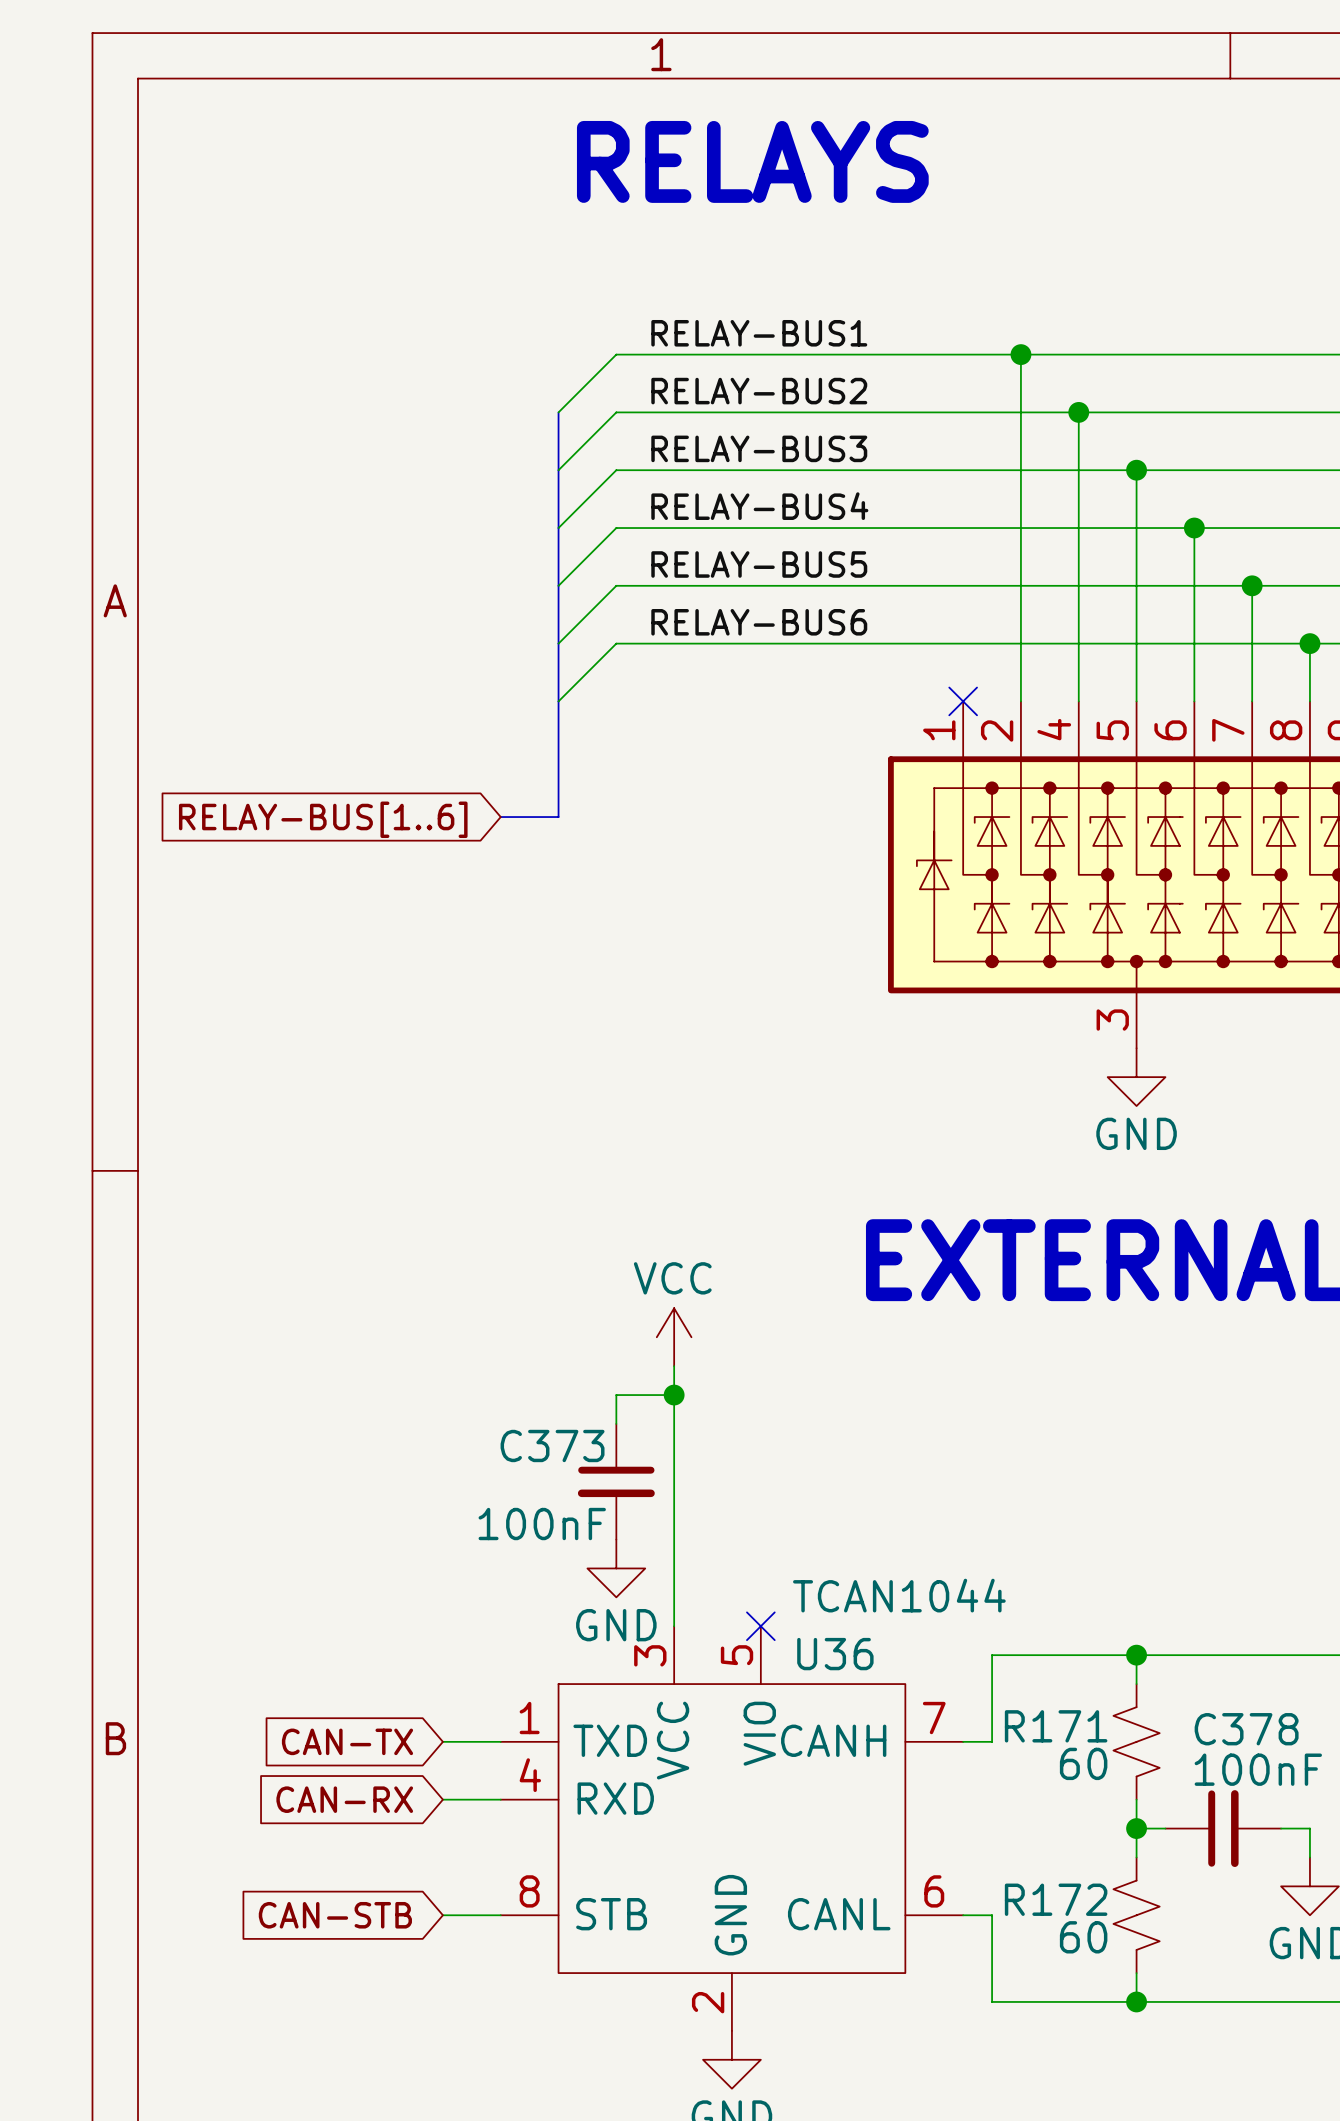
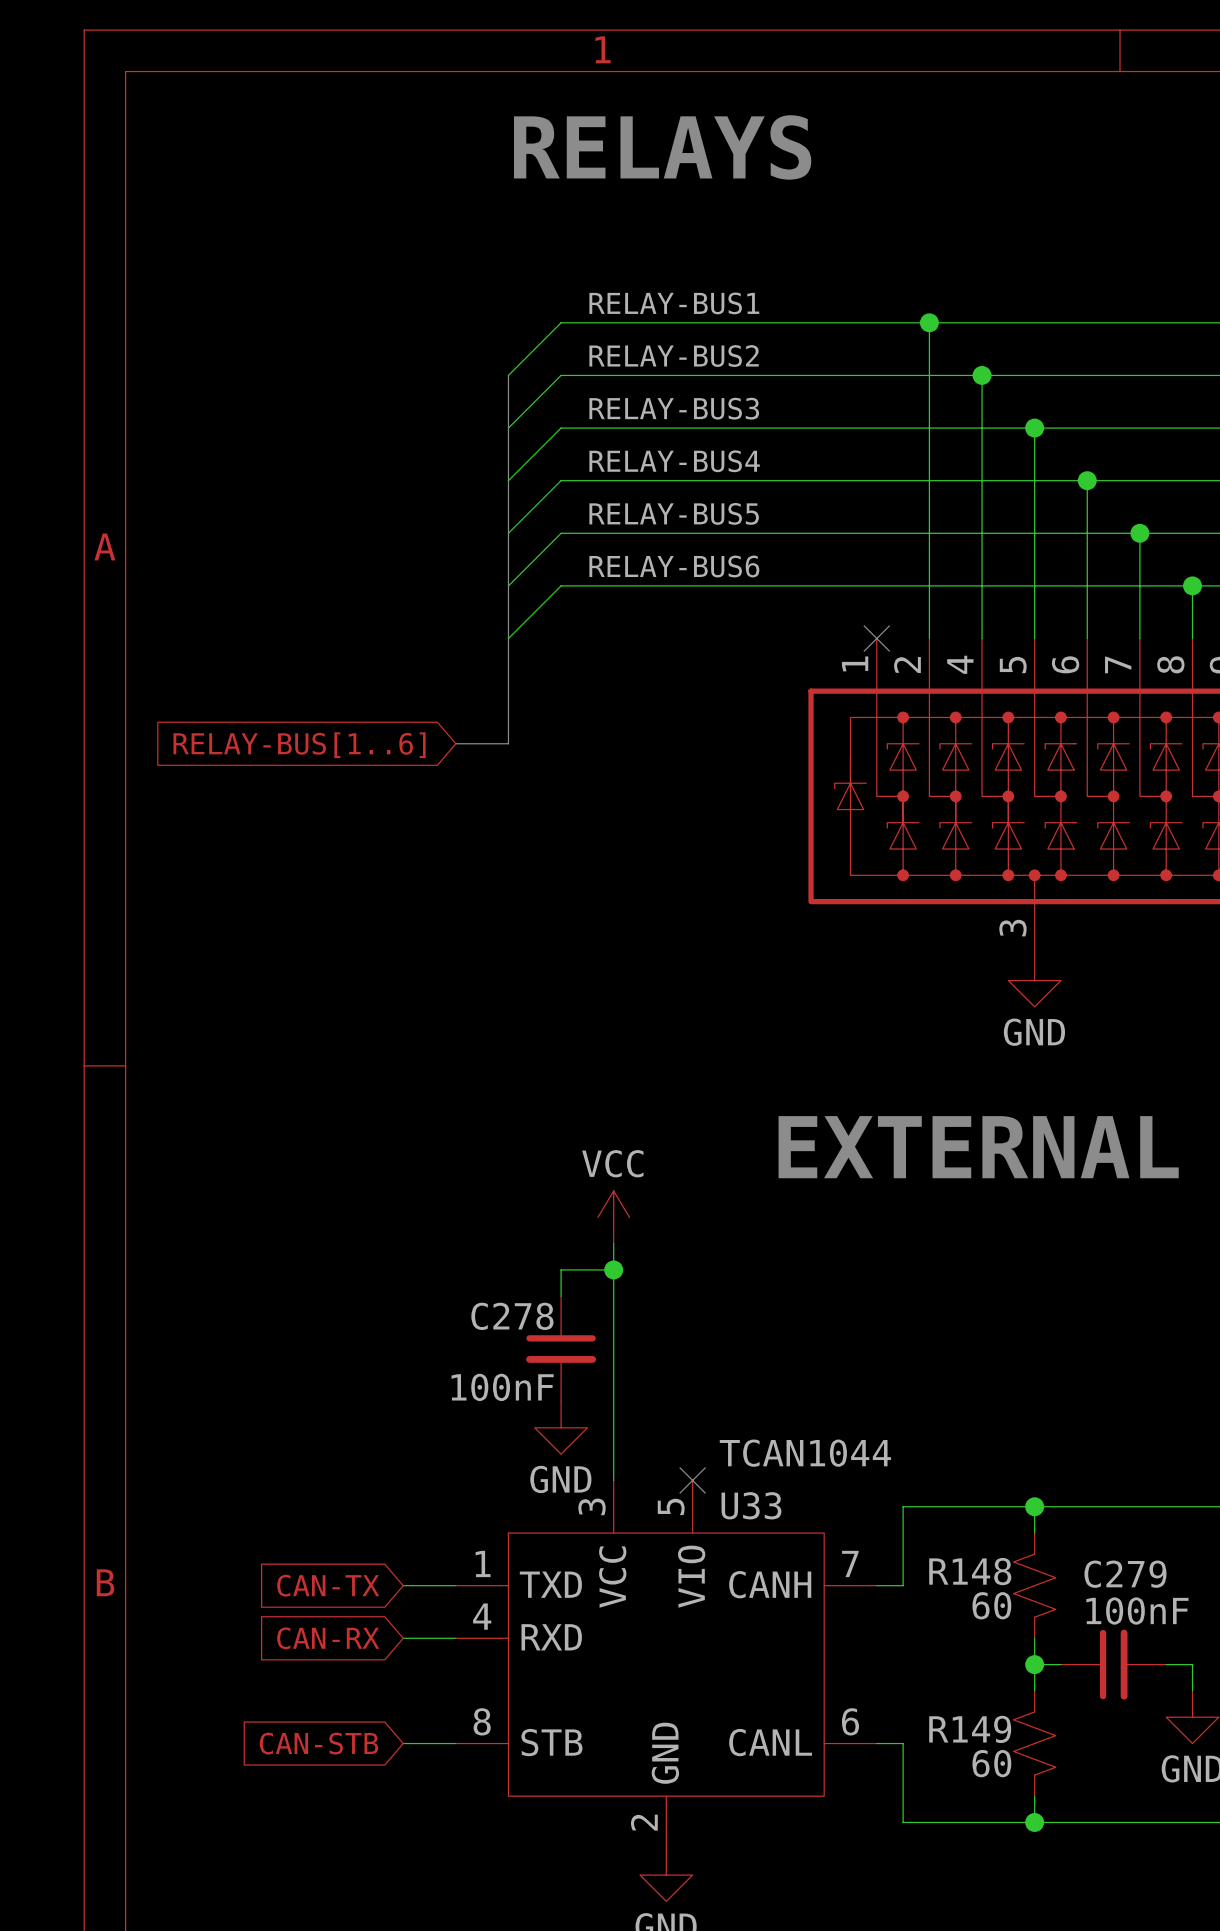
C373 name: C373 (552, 1445) -> C278 (512, 1316)
U36 name: U36 (835, 1654) -> U33 (751, 1505)
R171 name: R171 (1056, 1726) -> R148 (970, 1571)
C378 name: C378 (1246, 1729) -> C279 (1125, 1574)
R172 name: R172 (1056, 1899) -> R149 (970, 1729)

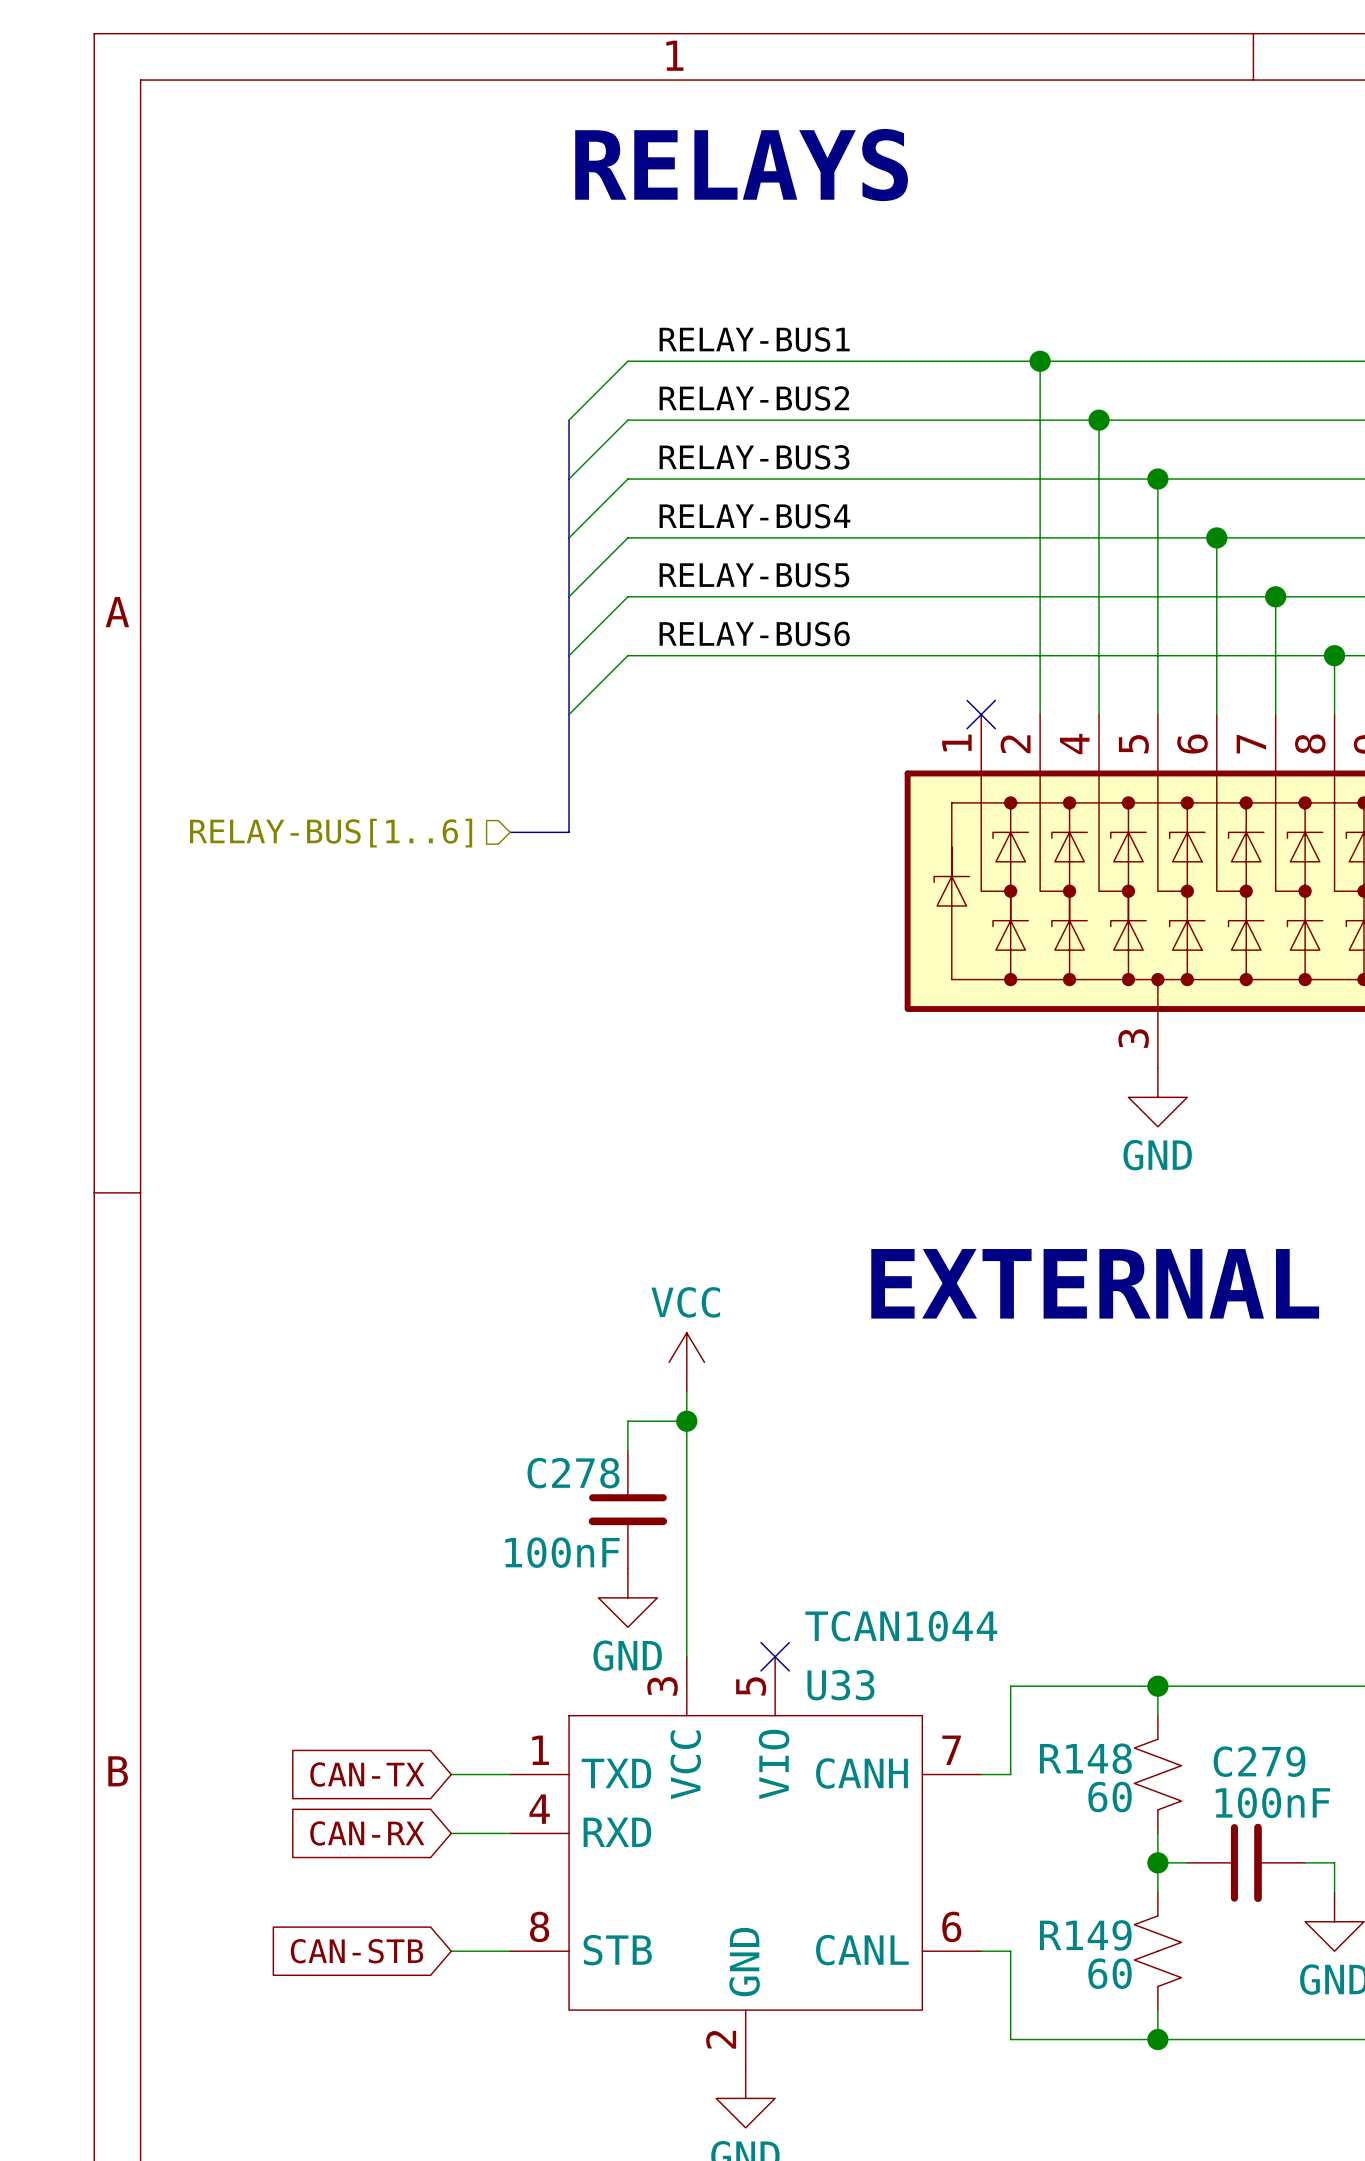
hierarchical label: none -> RELAY-BUS[1..6] (331, 833)
global label: RELAY-BUS[1..6] (299, 745) -> none

